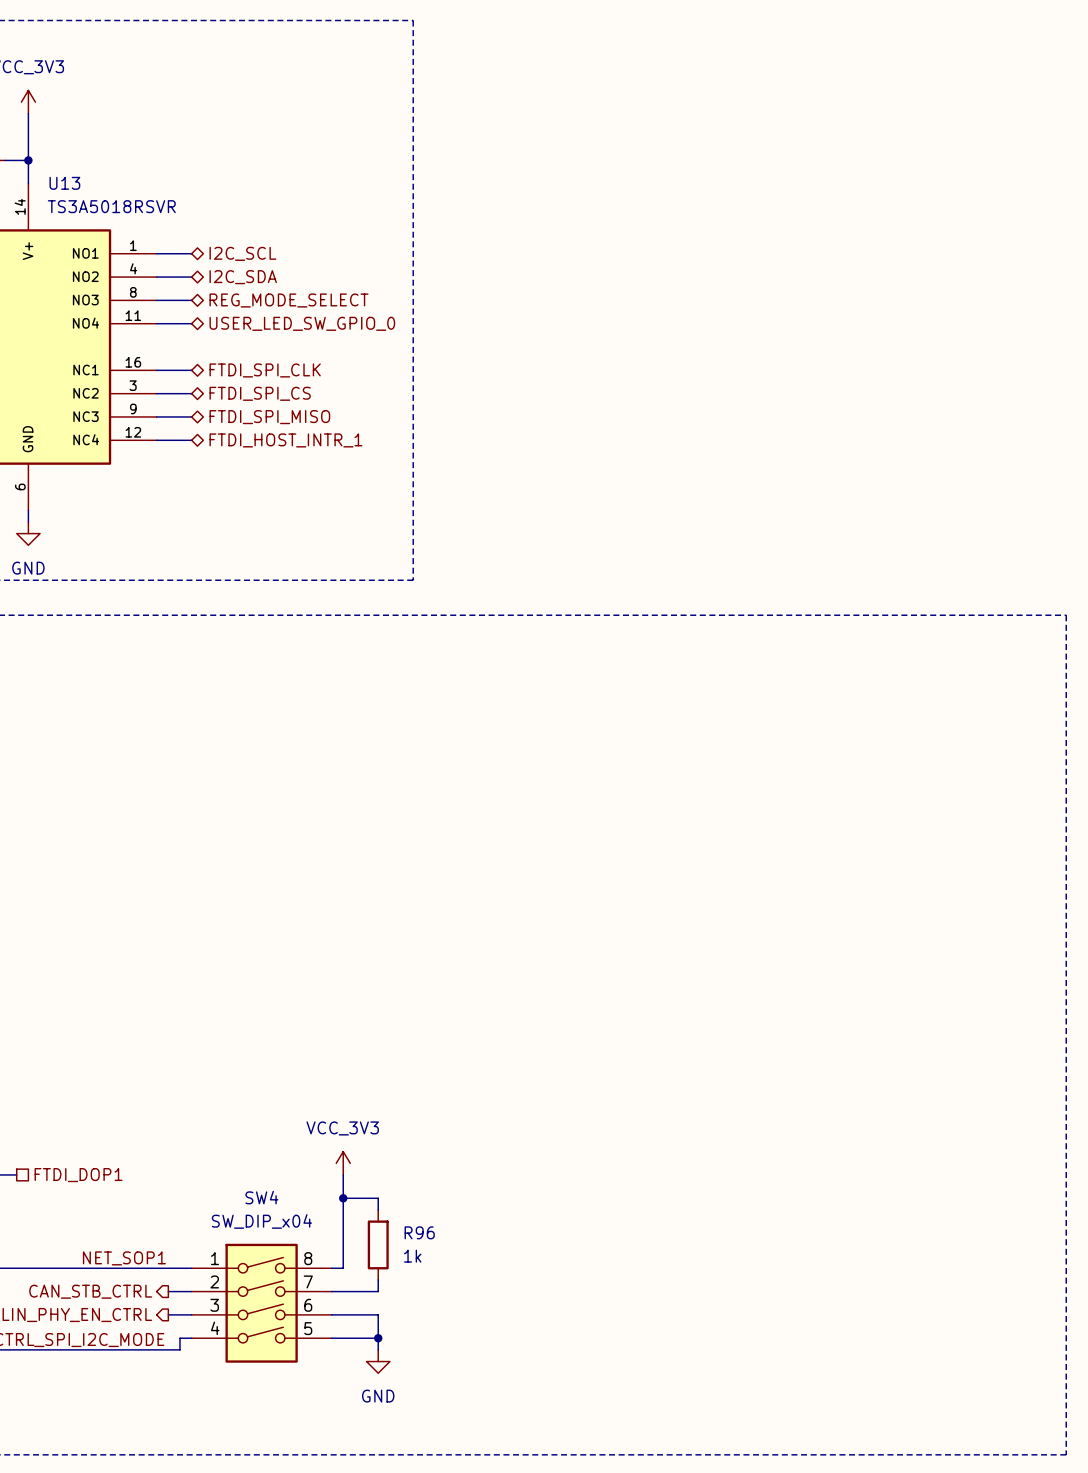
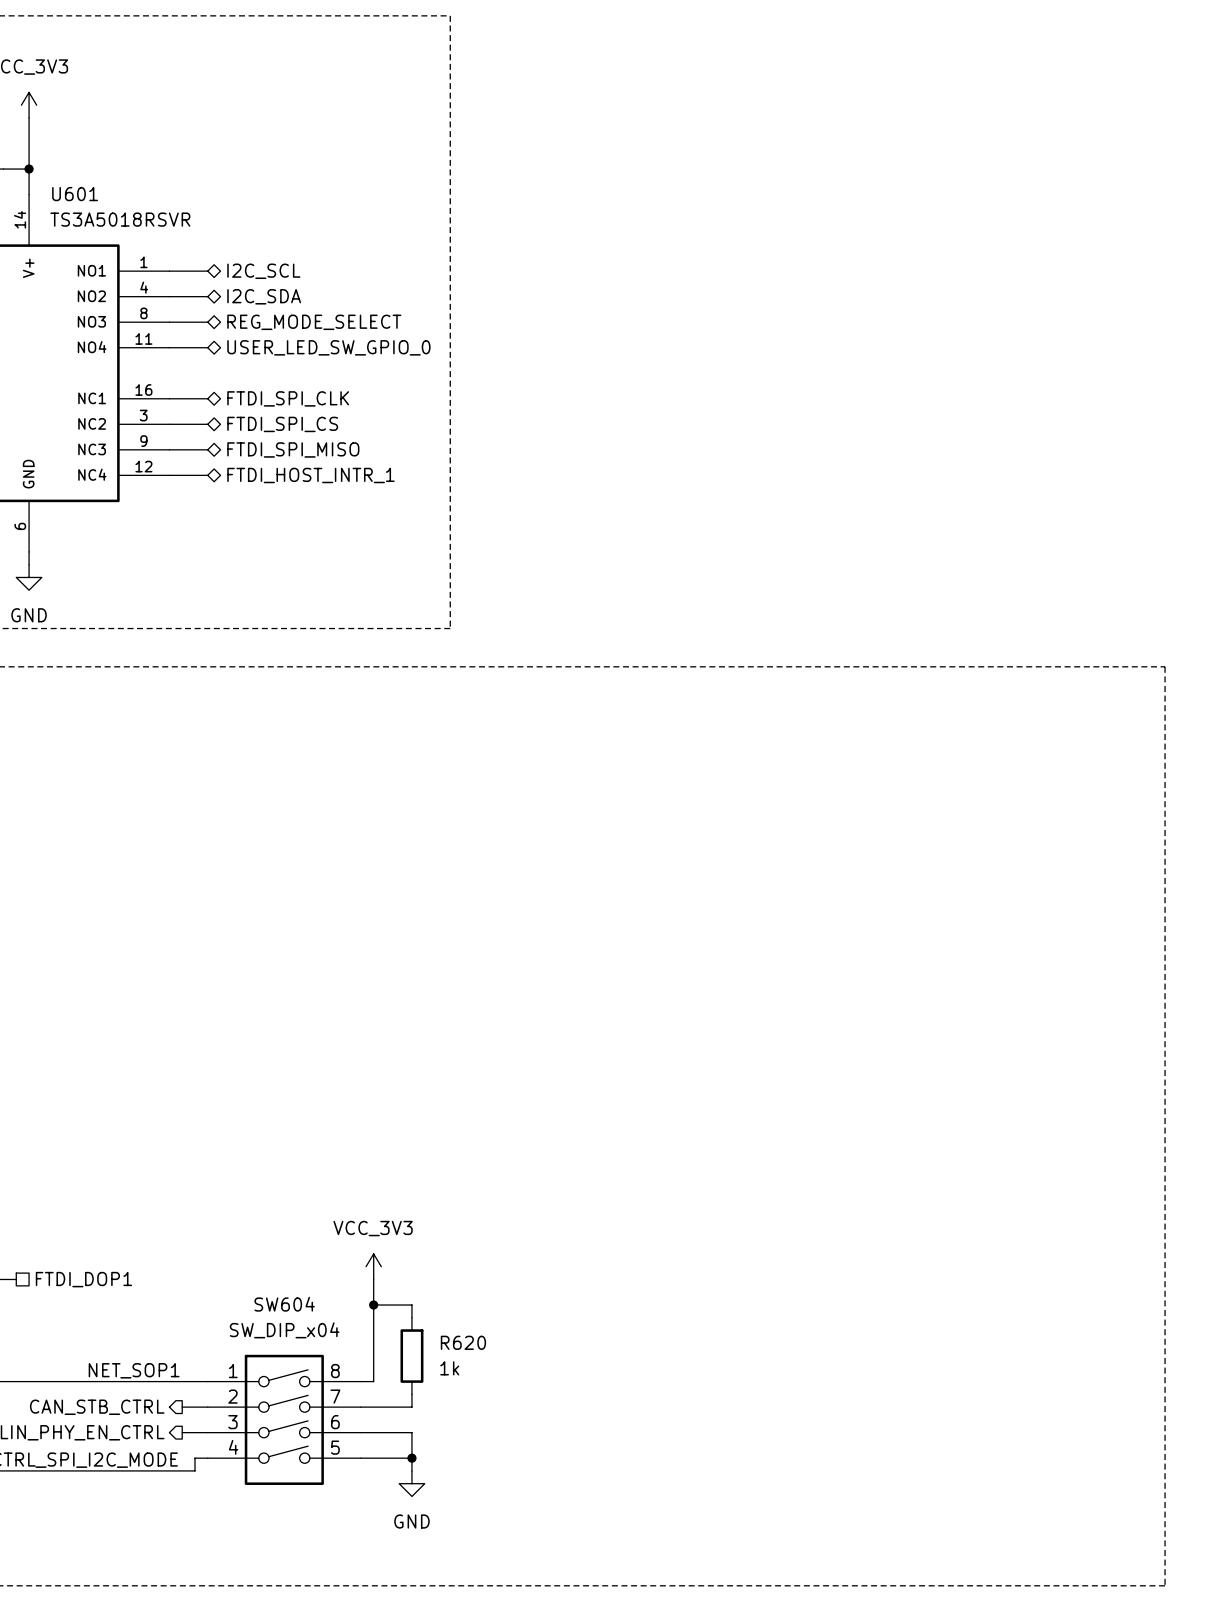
U13 name: U13 (64, 183) -> U601 (75, 194)
SW4 name: SW4 (261, 1197) -> SW604 (284, 1304)
R96 name: R96 (419, 1232) -> R620 (463, 1342)

